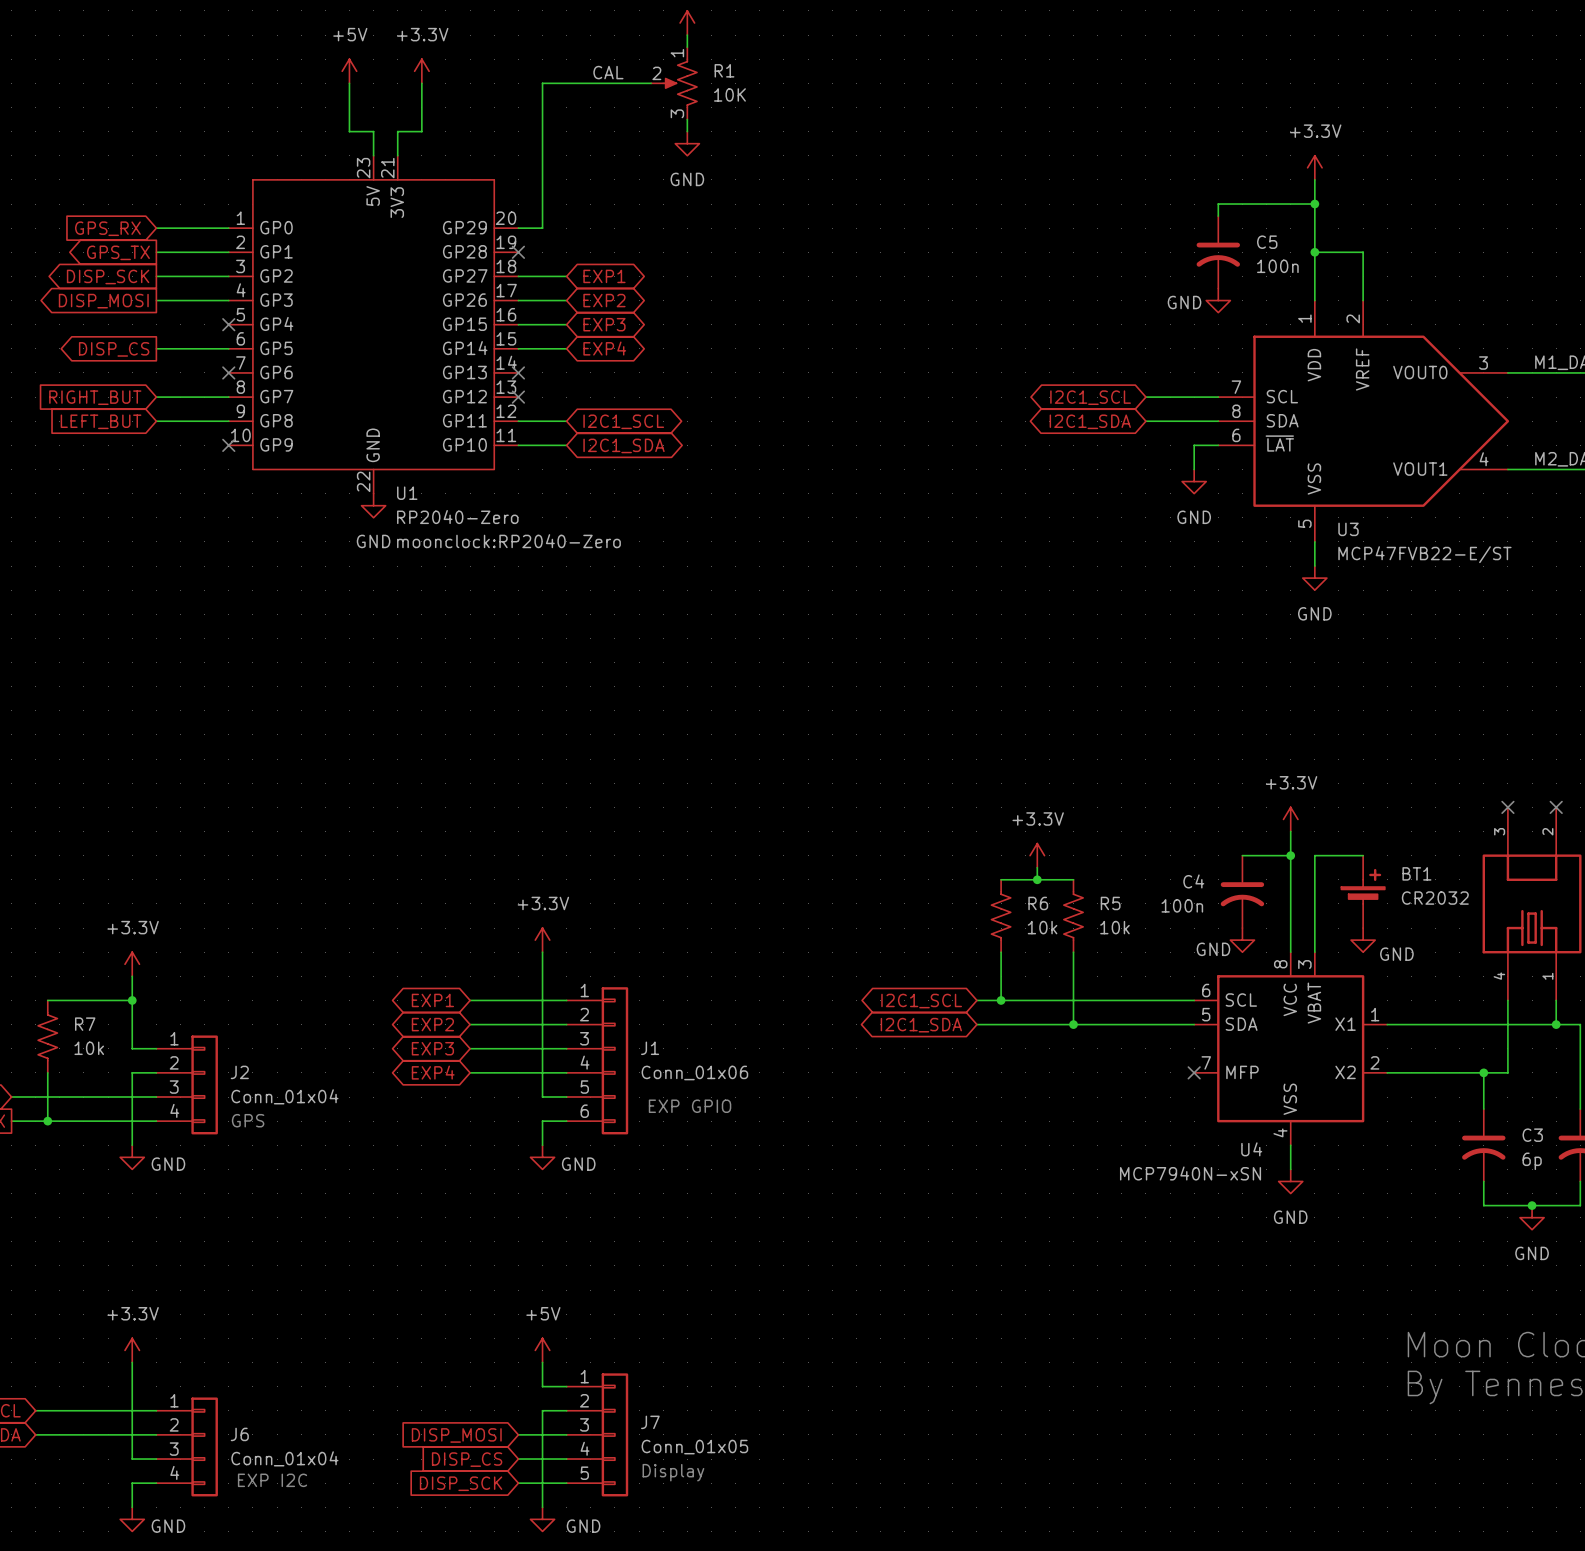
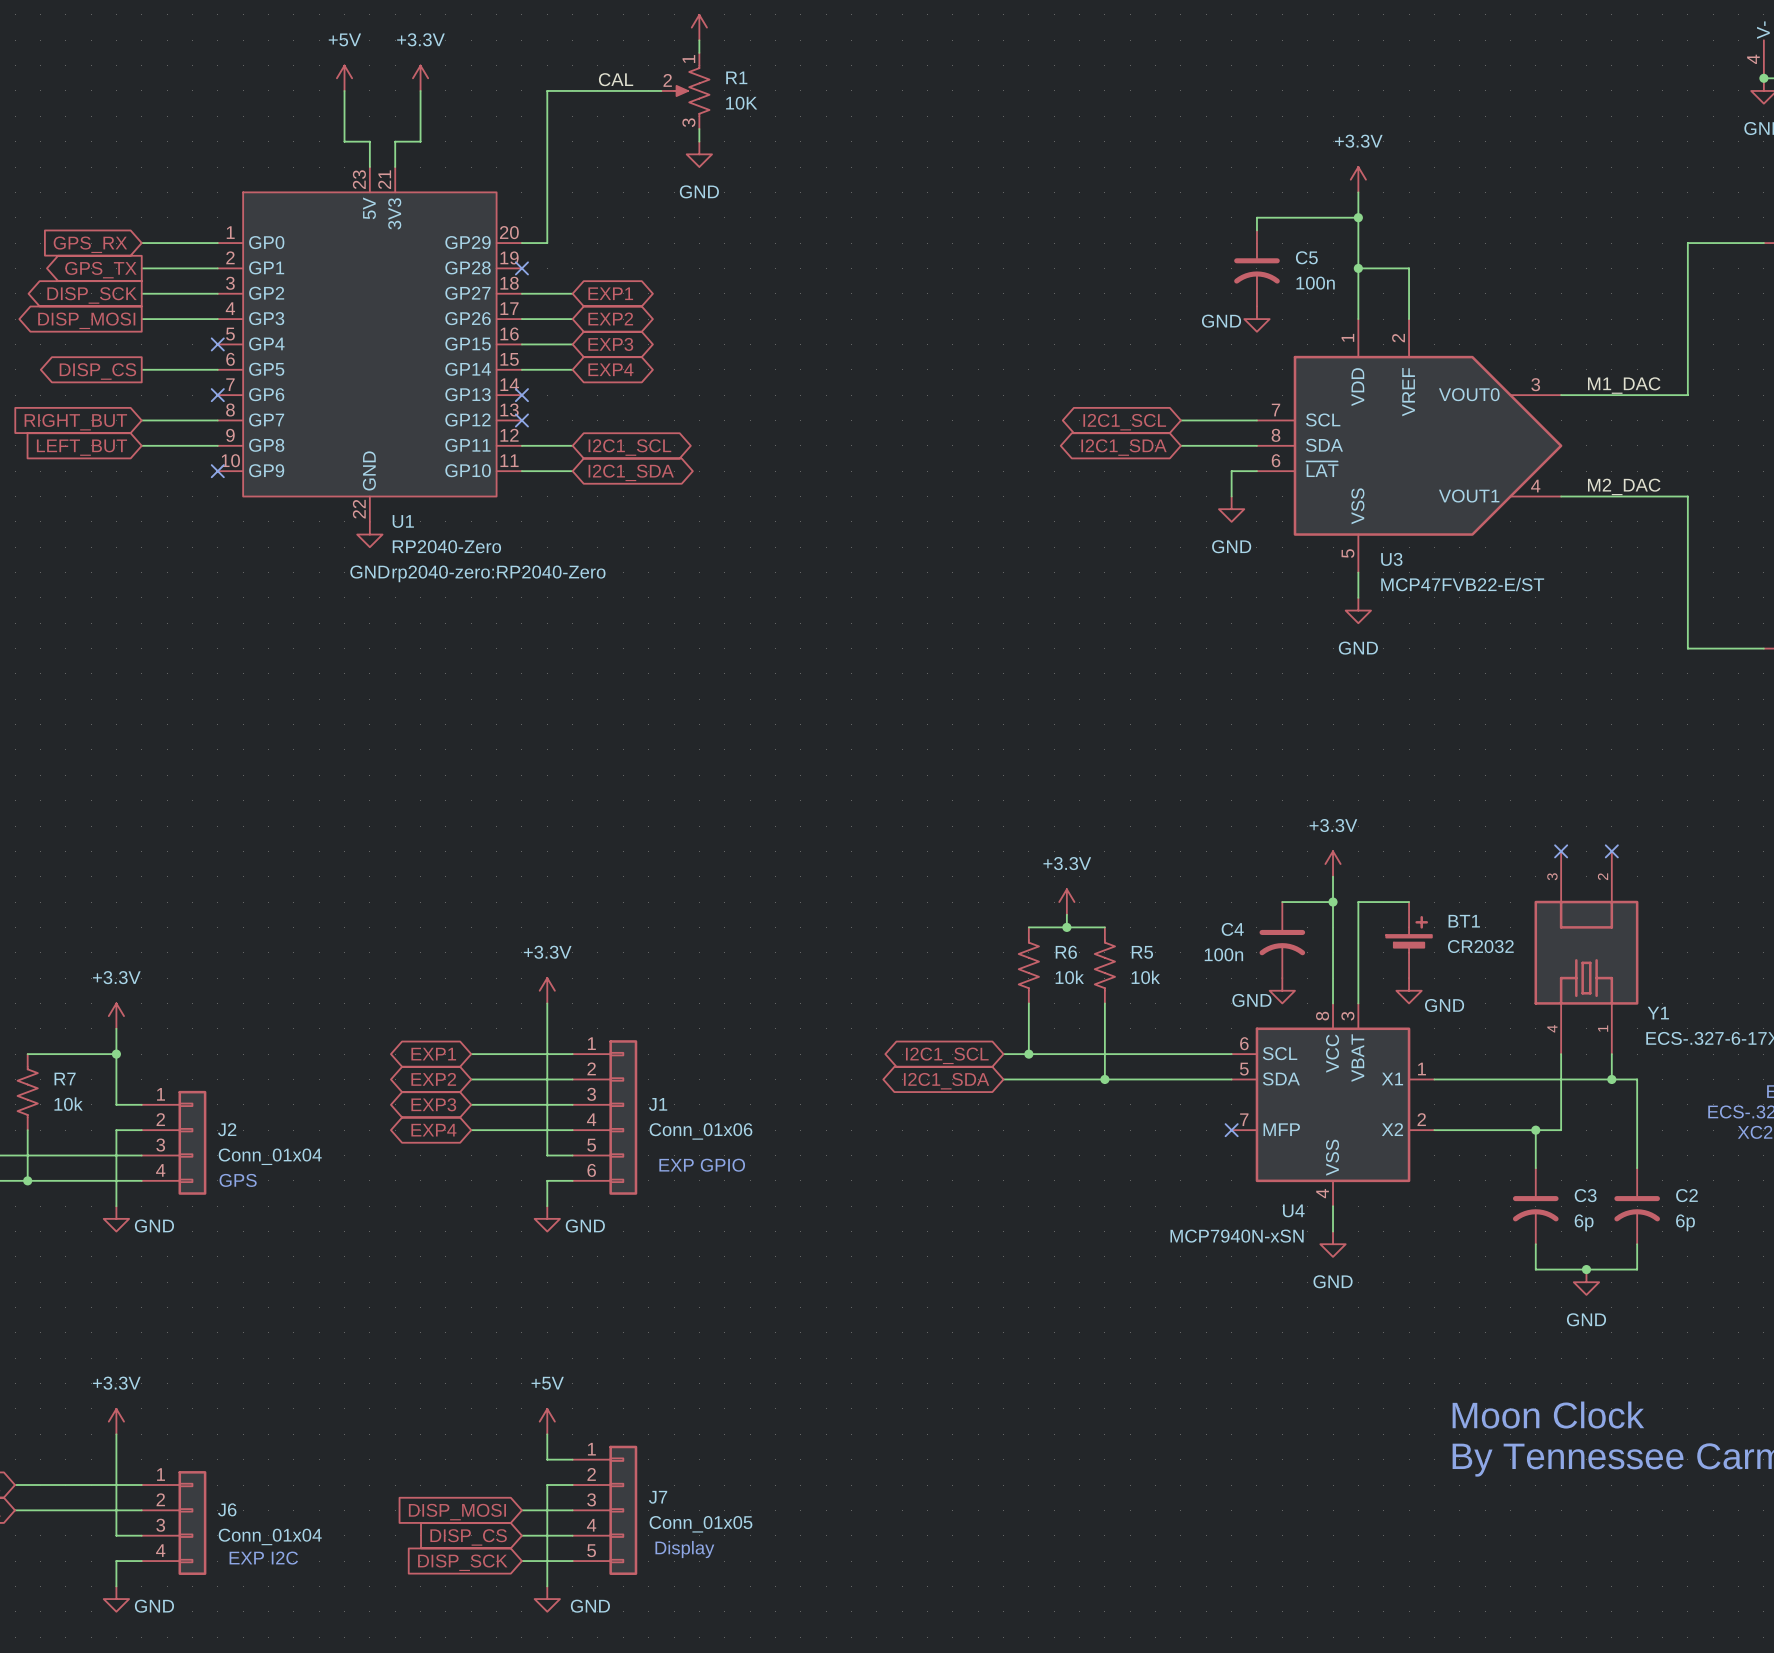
U1 text: moonclock:RP2040-Zero (508, 541) -> rp2040-zero:RP2040-Zero (498, 573)

